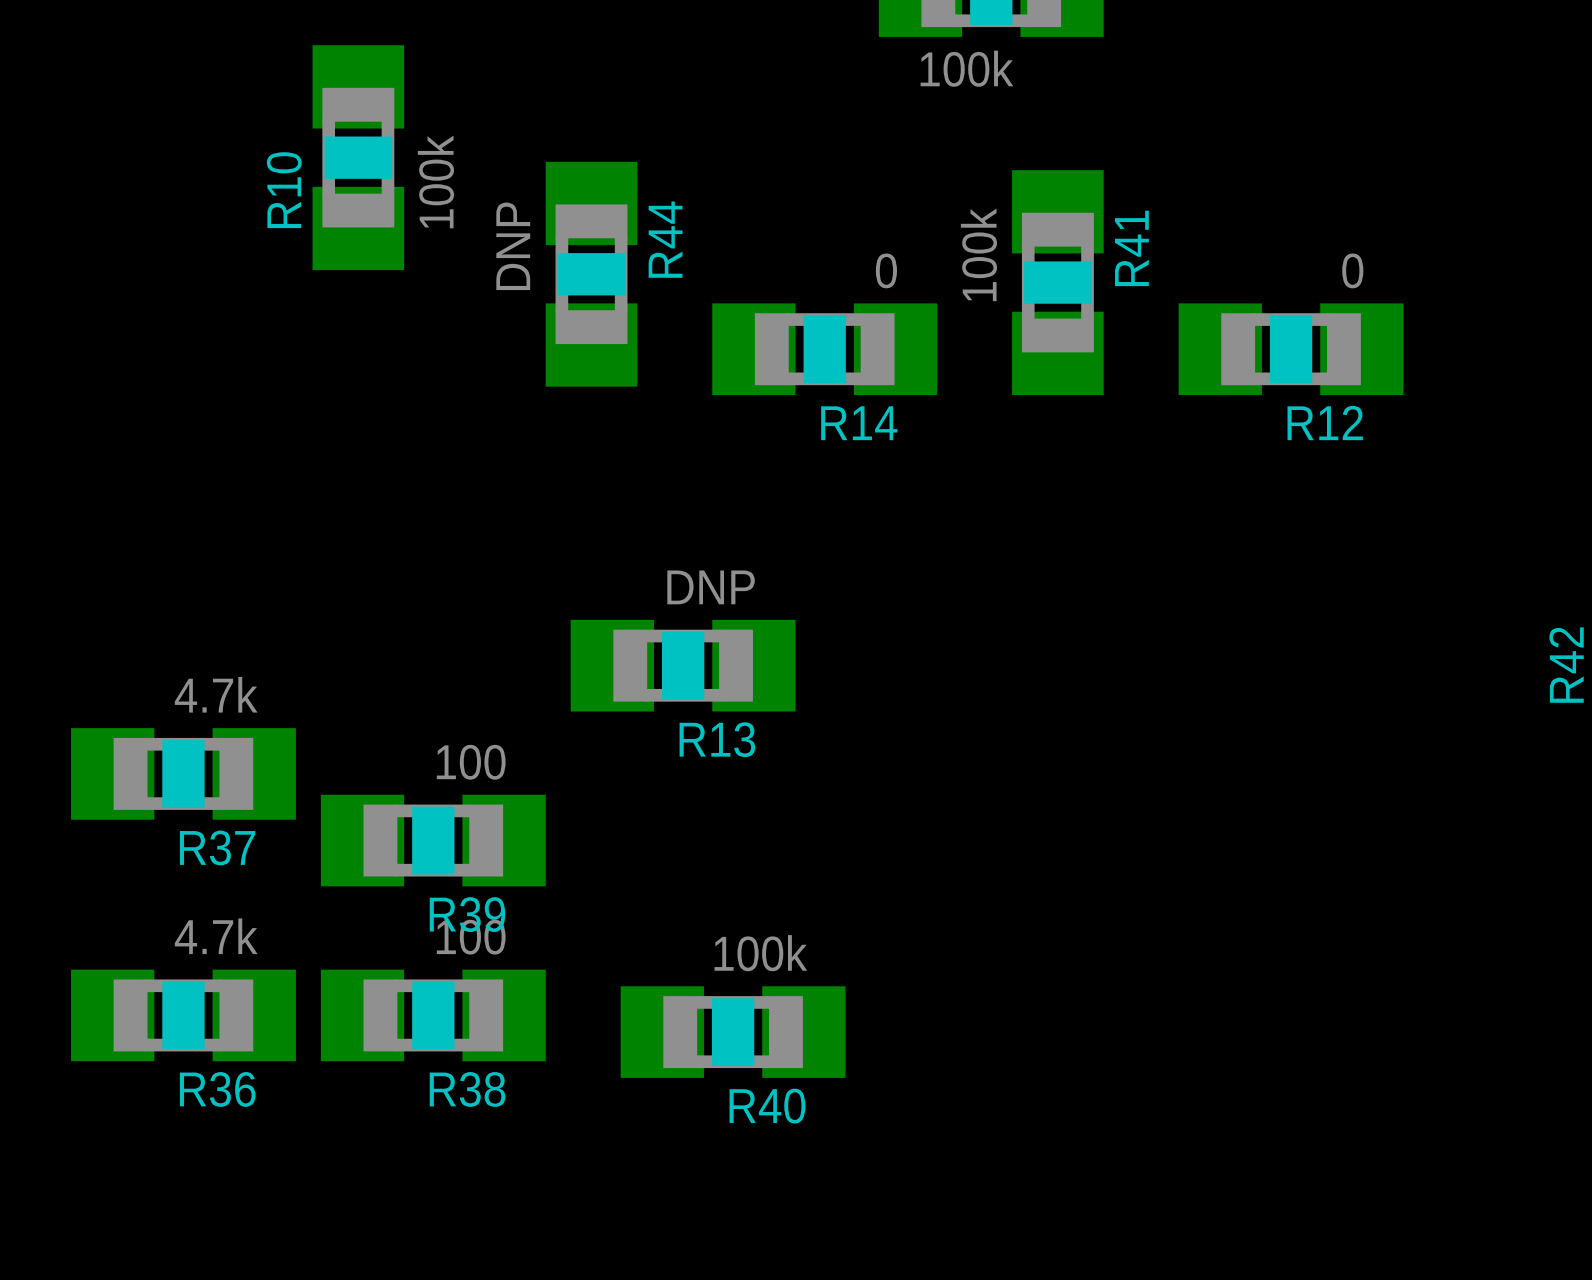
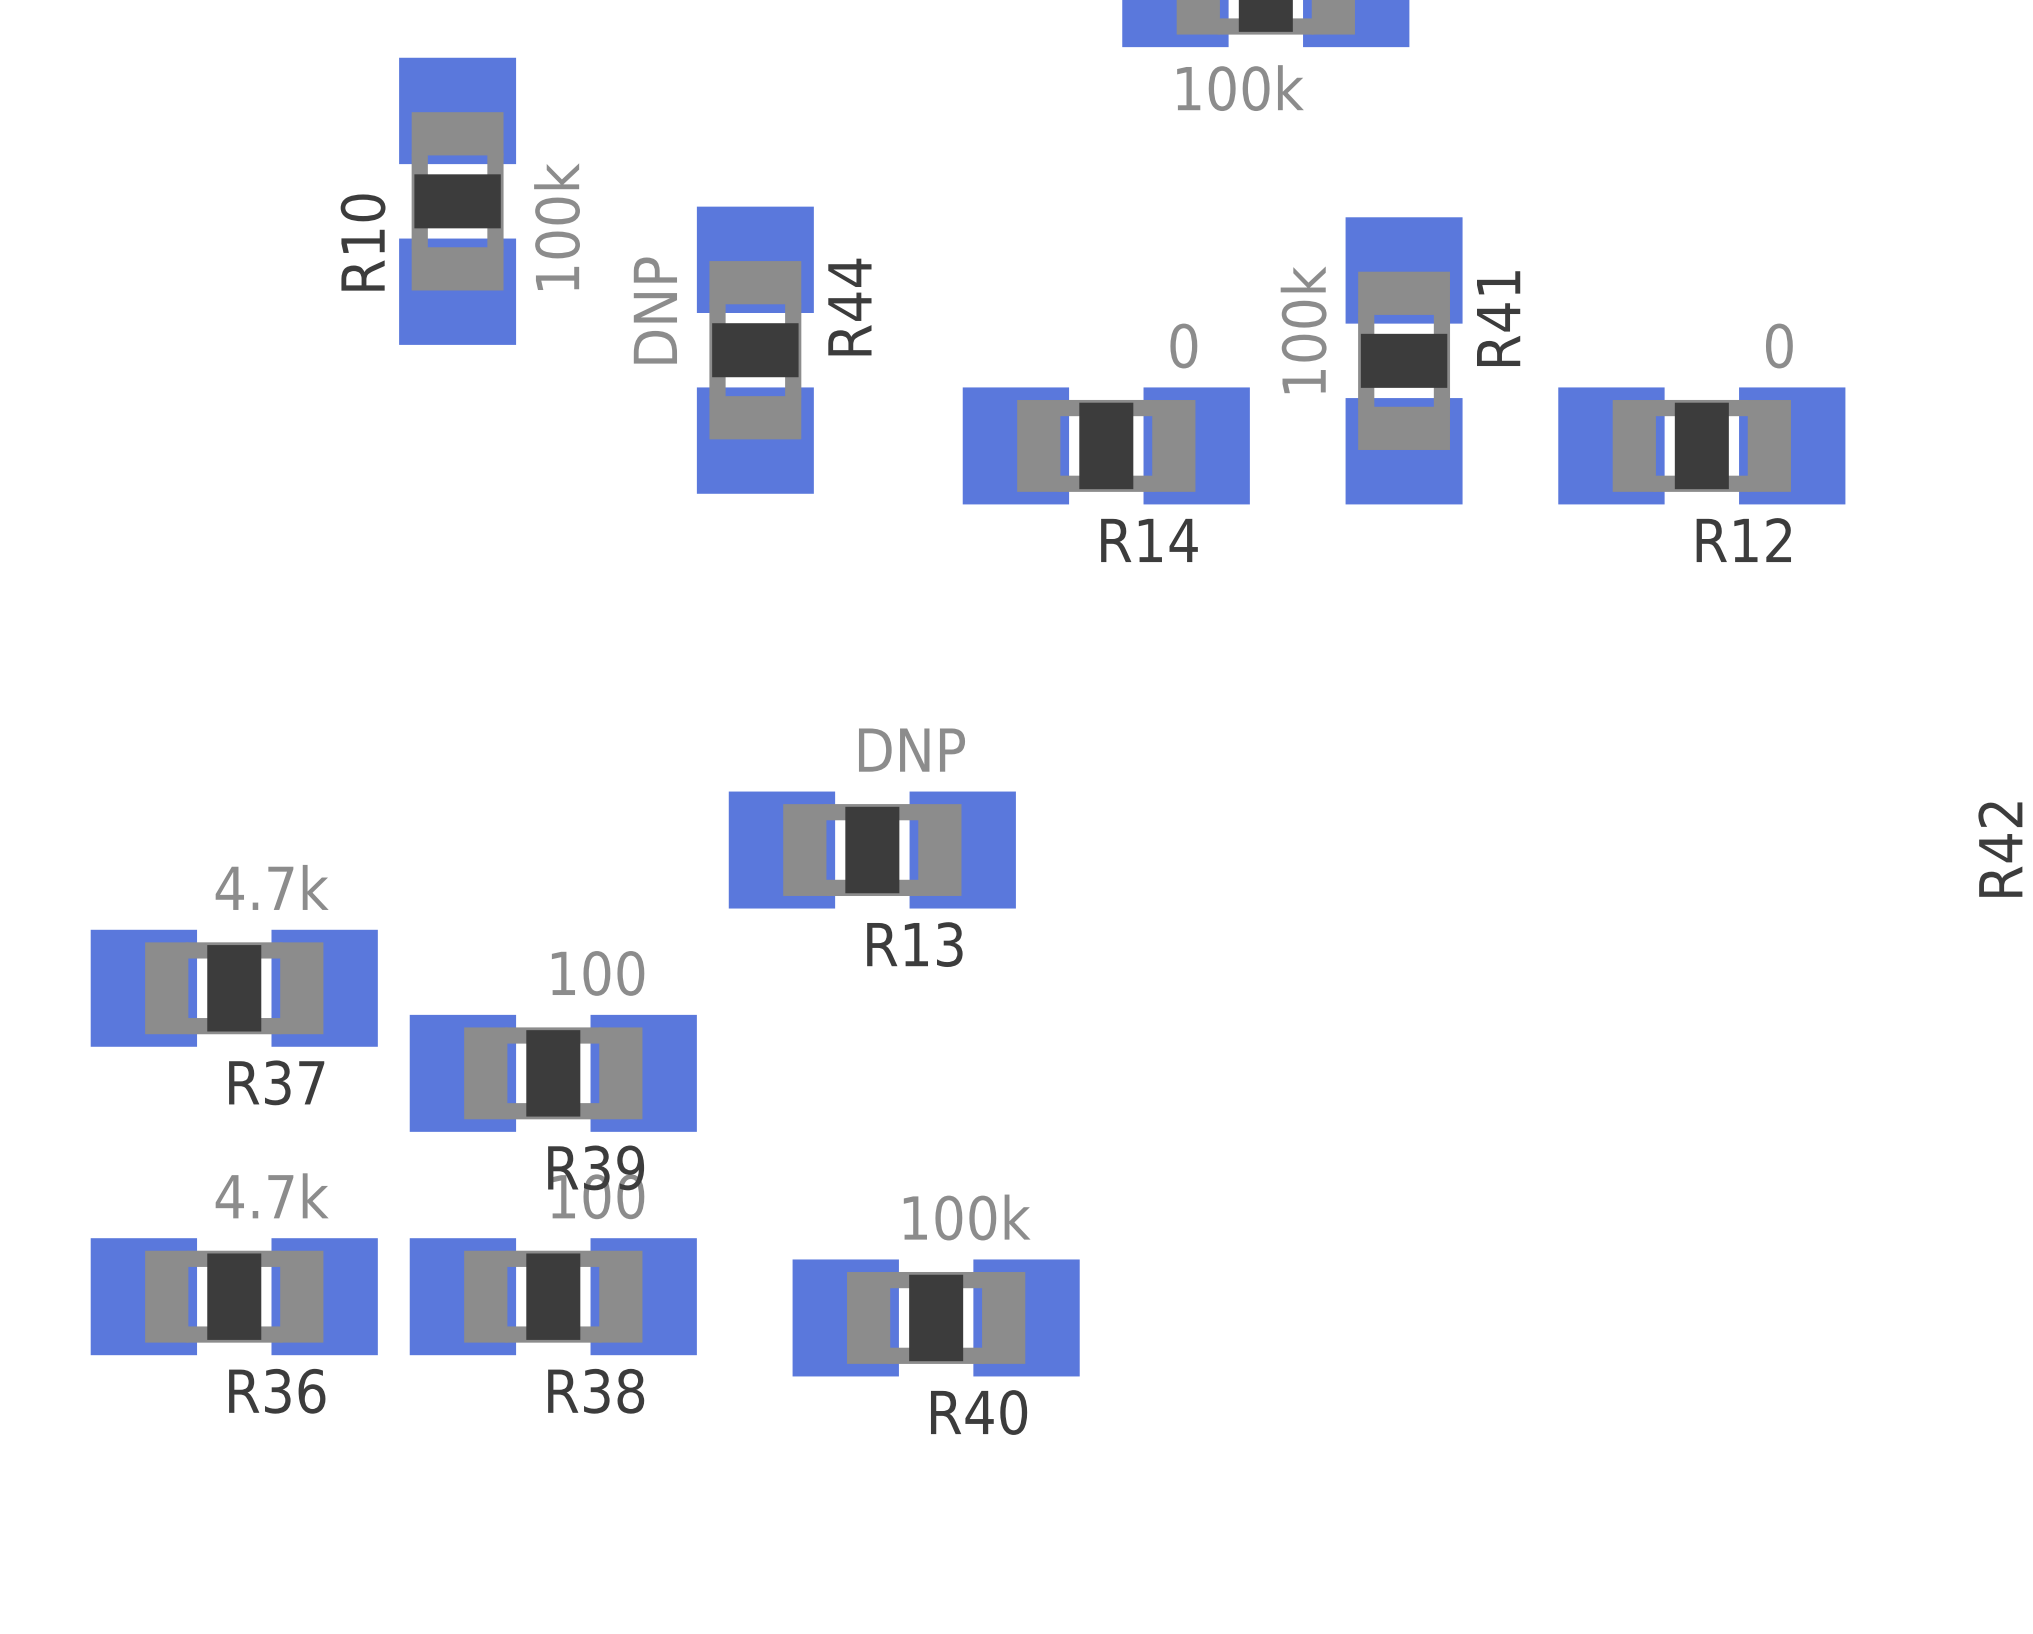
R41 position: (1057, 282) -> (1404, 360)
R14 position: (824, 349) -> (1106, 445)
R12 position: (1291, 349) -> (1701, 445)

